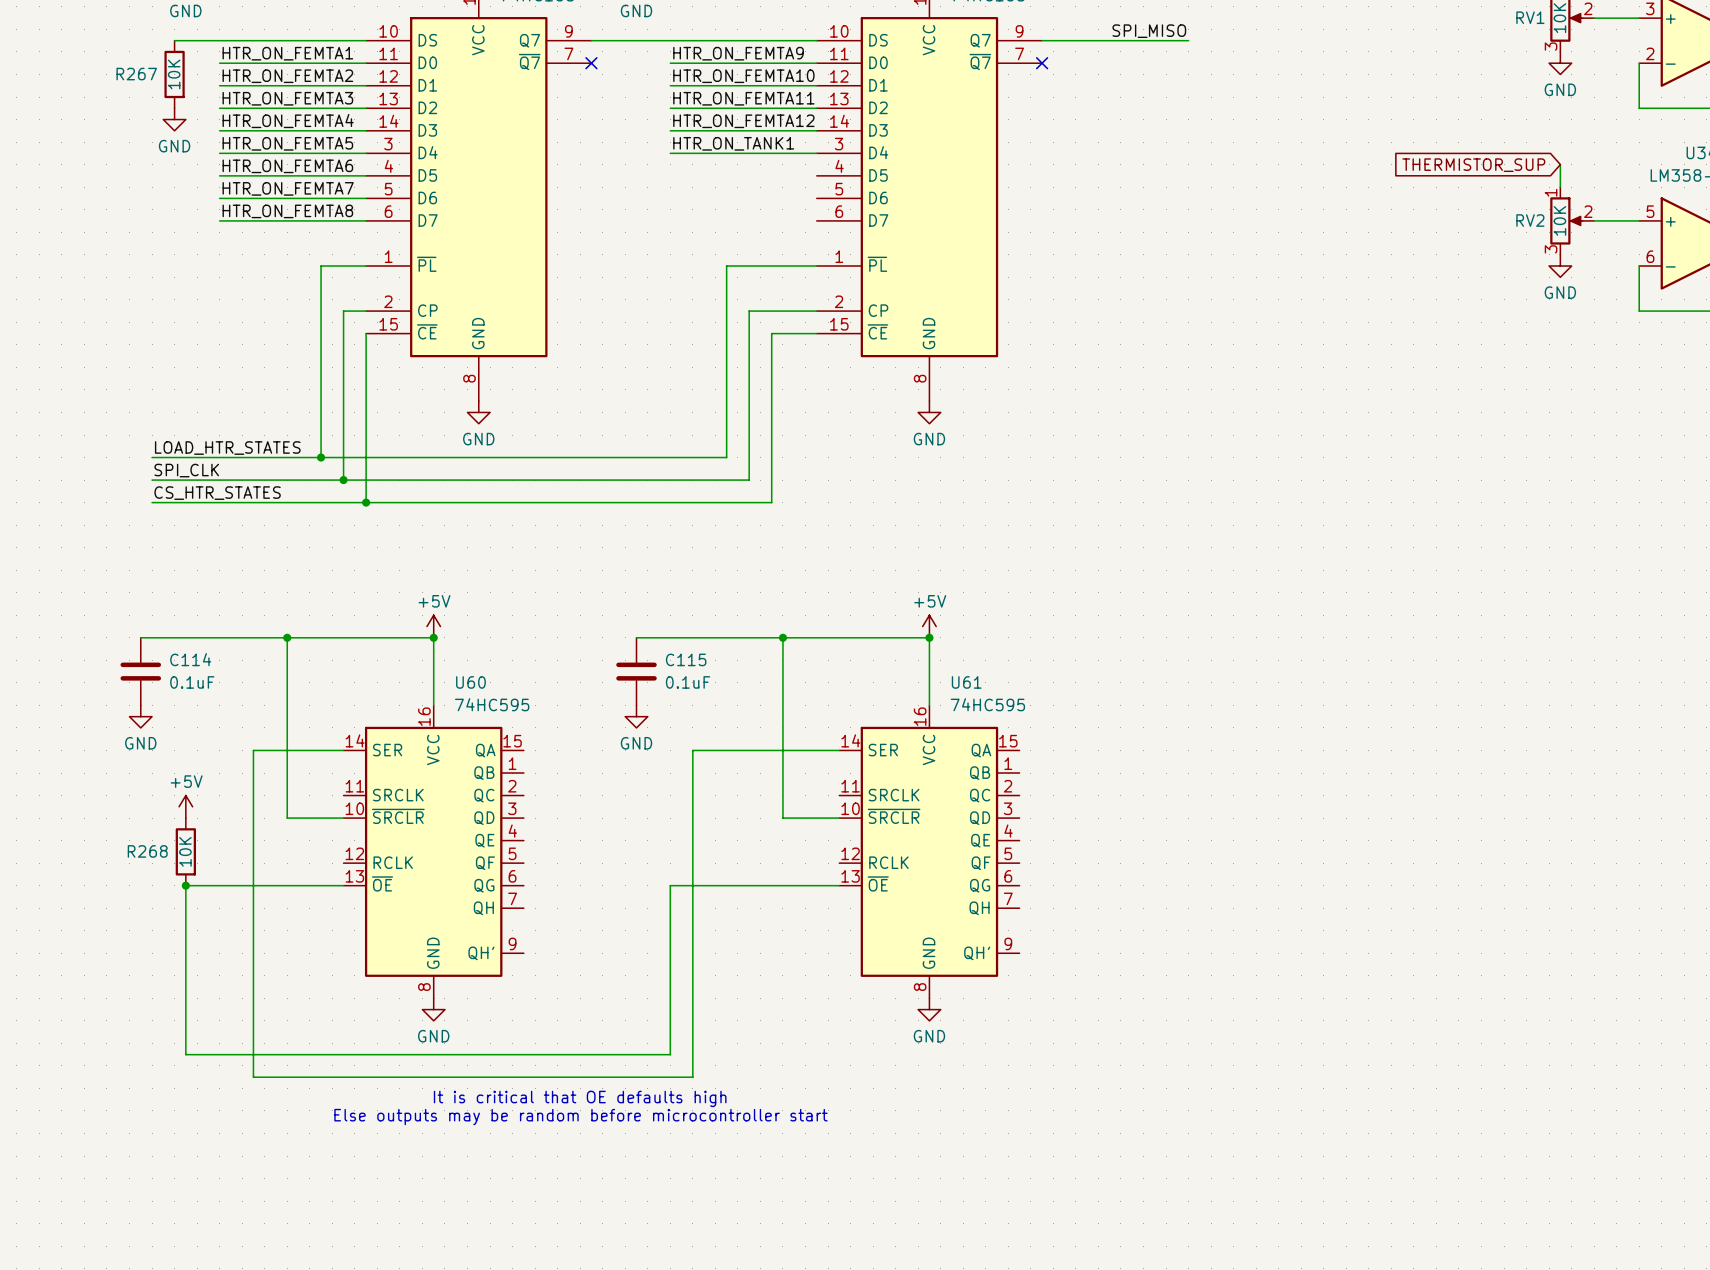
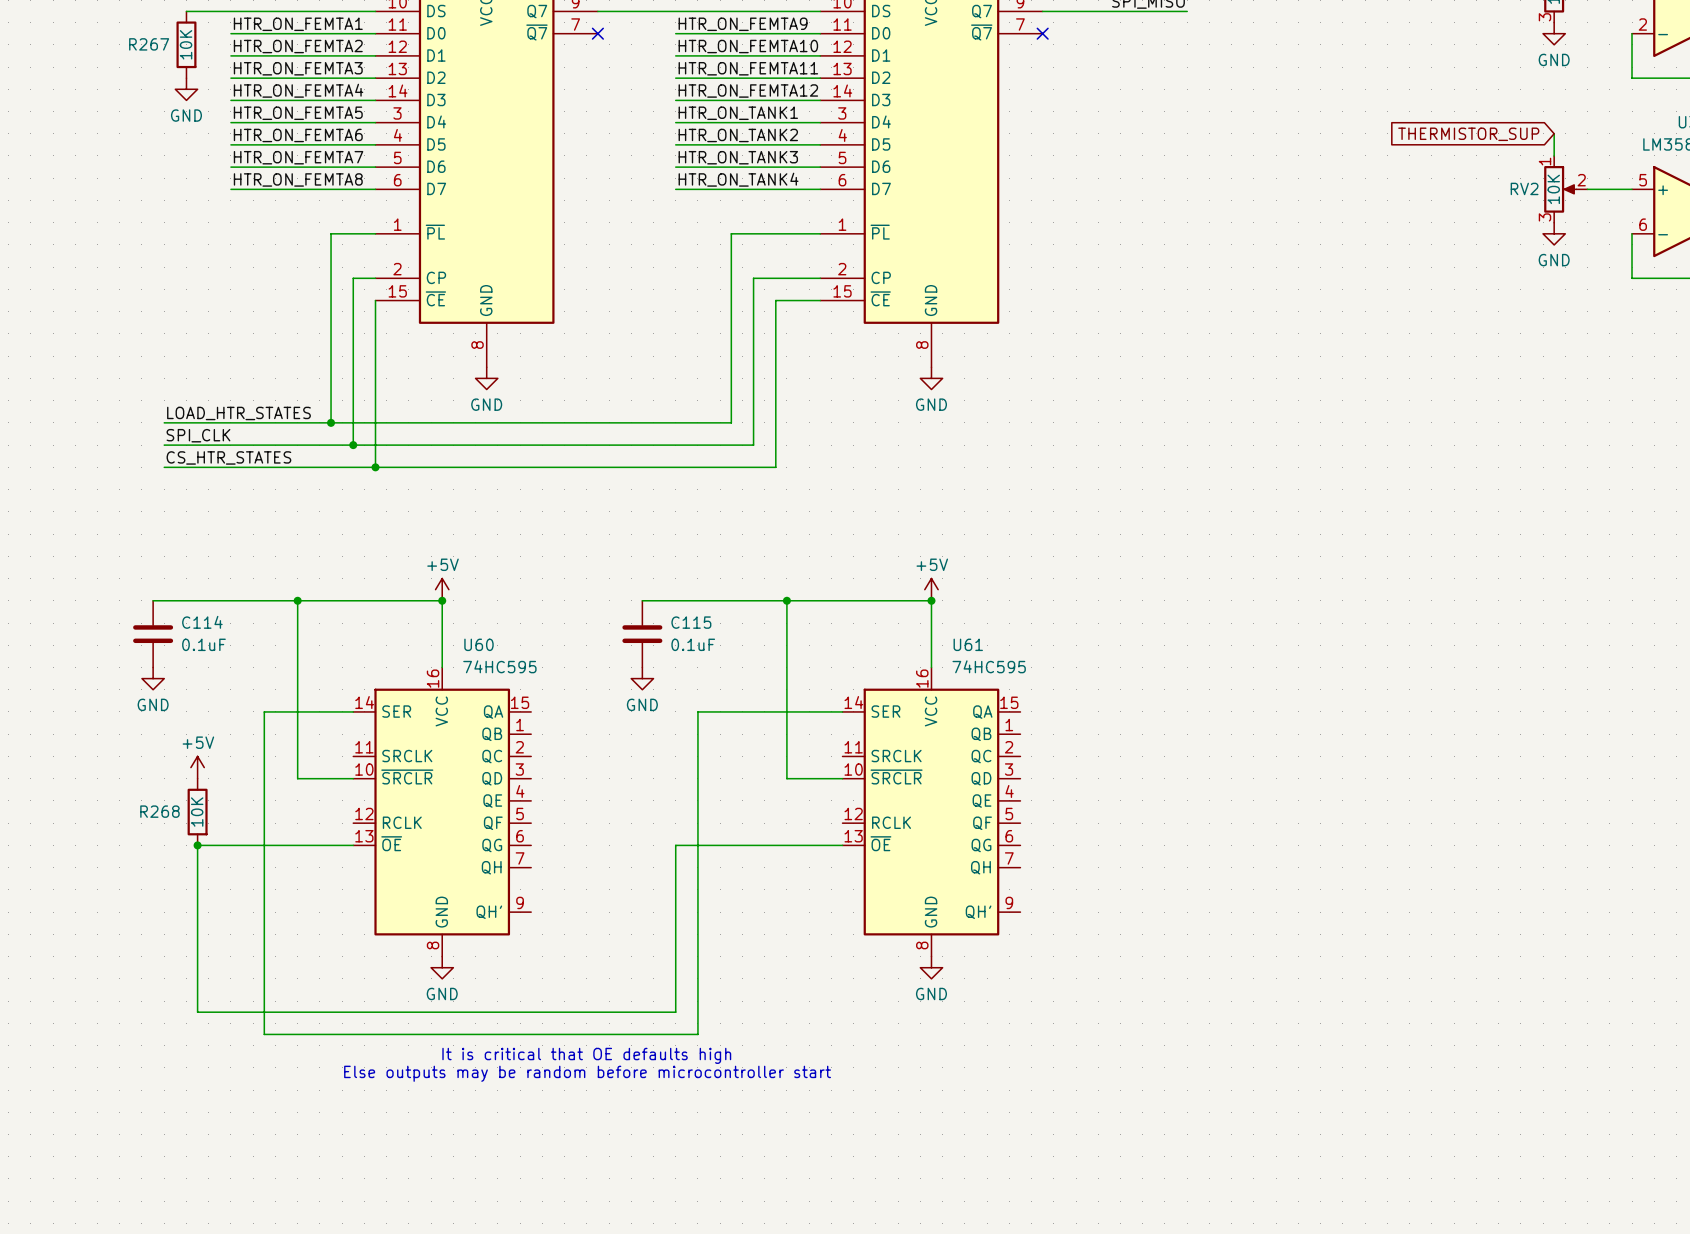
label: none -> HTR_ON_TANK2 (738, 135)
wire: none -> (675, 144) (820, 144)
label: none -> HTR_ON_TANK3 (738, 157)
wire: none -> (675, 167) (820, 167)
label: none -> HTR_ON_TANK4 (738, 179)
wire: none -> (675, 189) (820, 189)

